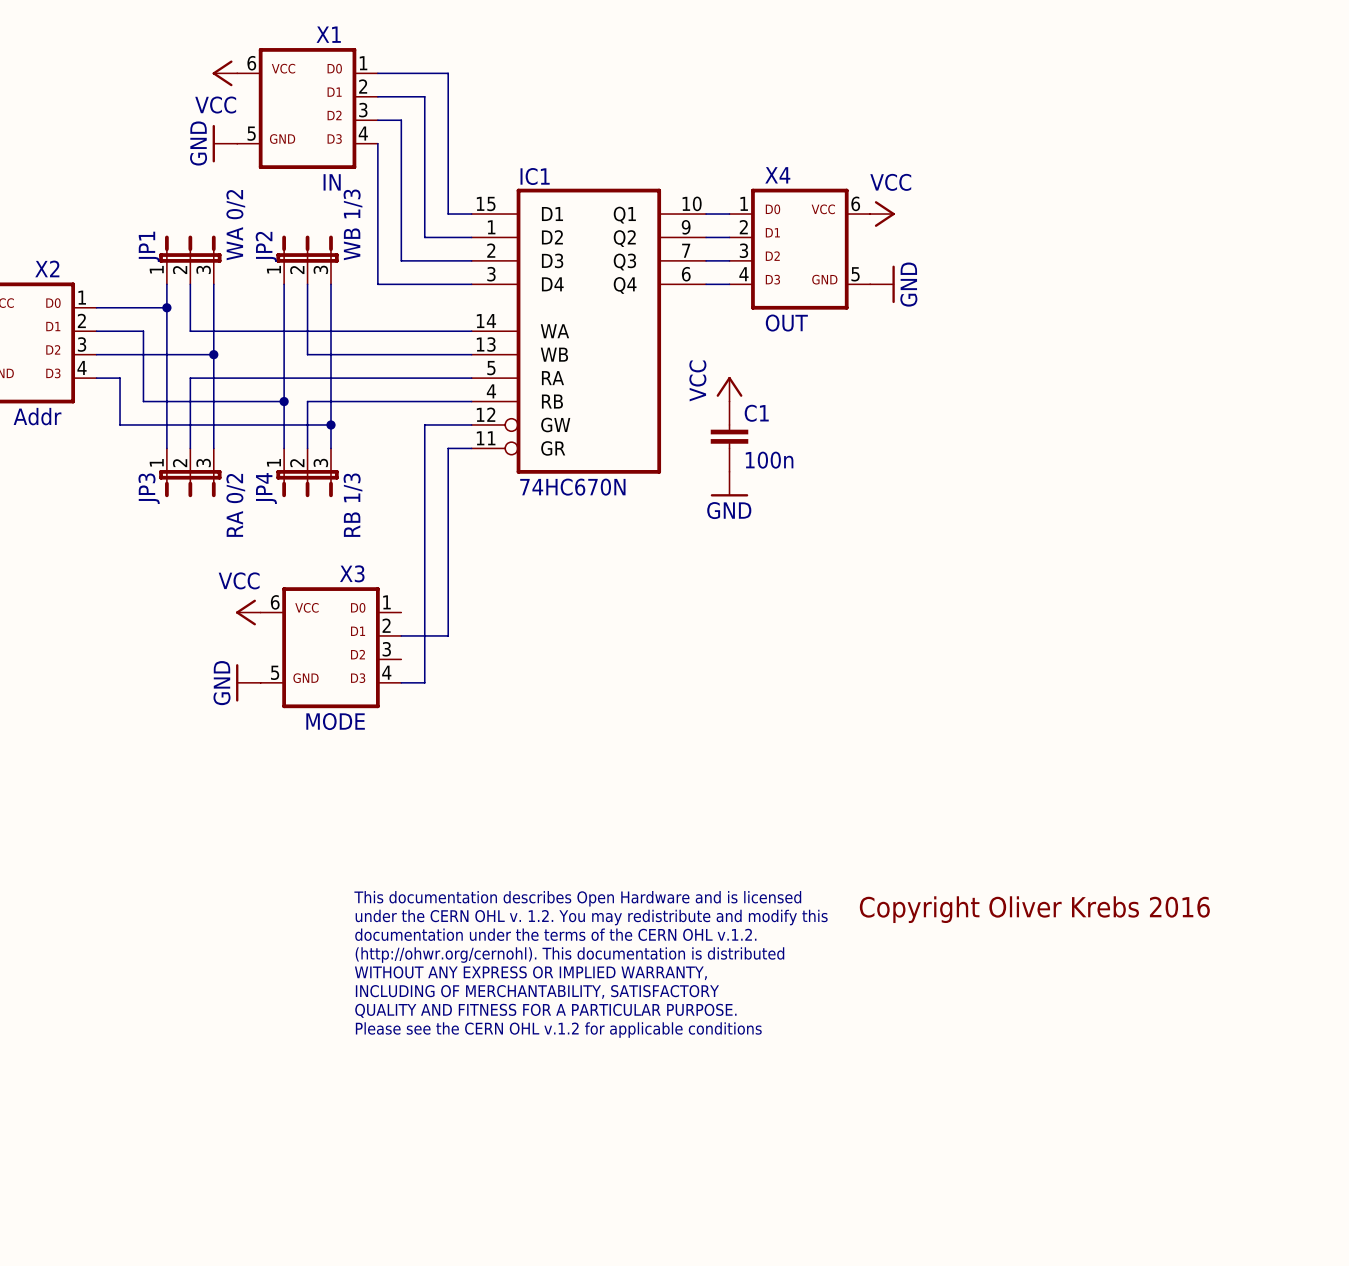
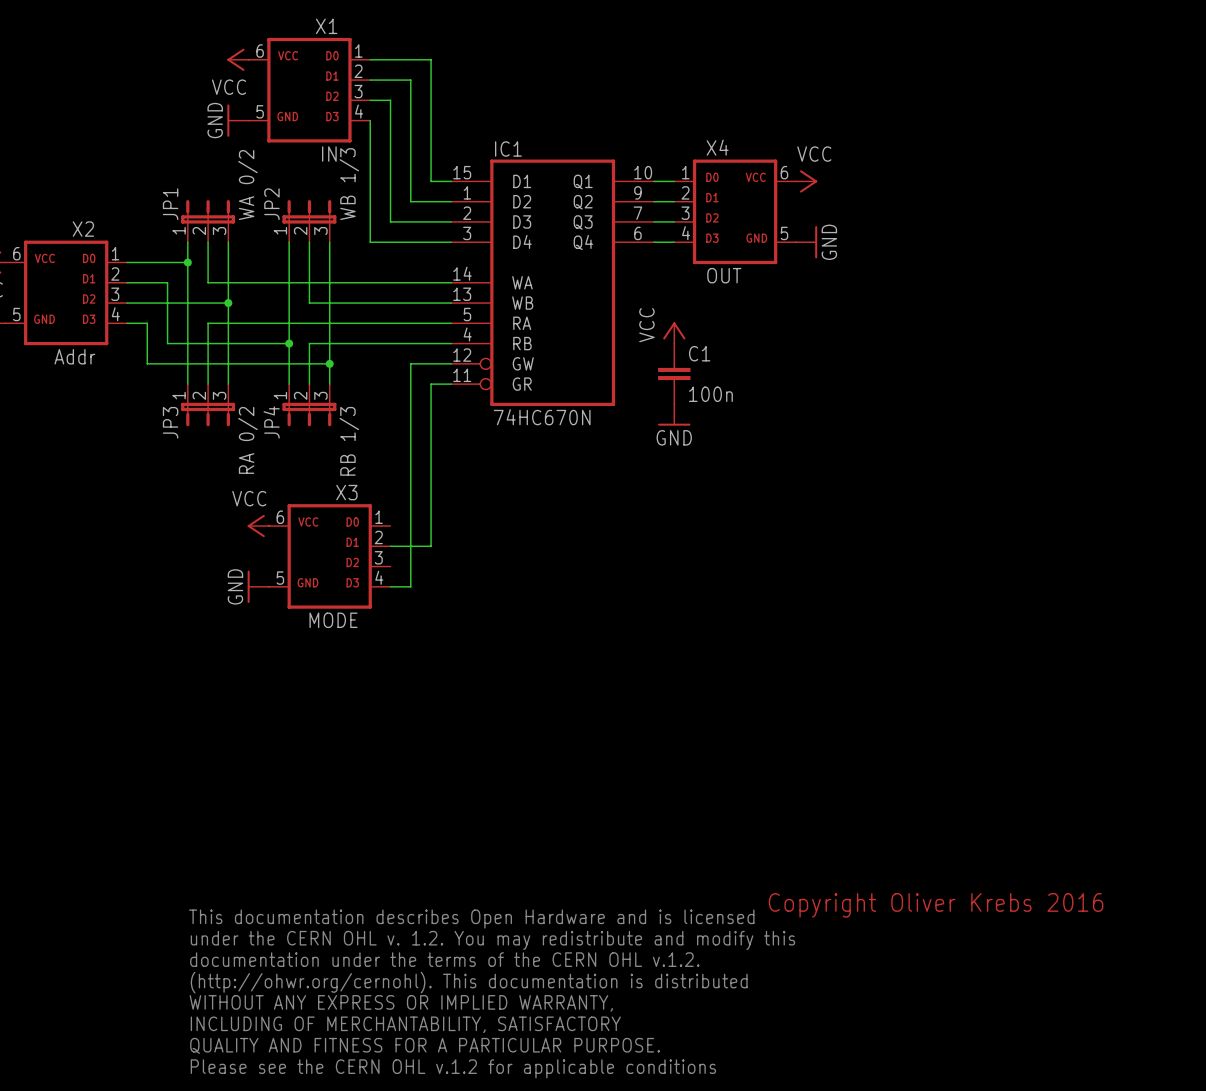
text: This documentation describes Open Hardware and is licensed (577, 898) -> none
text position: Copyright Oliver Krebs 2016 (1034, 909) -> Copyright Oliver Krebs 2016 (936, 905)
text: under the CERN OHL v. 1.2. You may redistribute and modify this (591, 917) -> none
text: documentation under the terms of the CERN OHL v.1.2. (555, 934) -> none
text: (http://ohwr.org/cernohl). This documentation is distributed (569, 955) -> none
text: WITHOUT ANY EXPRESS OR IMPLIED WARRANTY, (530, 973) -> none
text: INCLUDING OF MERCHANTABILITY, SATISFACTORY (537, 991) -> none
text: QUALITY AND FITNESS FOR A PARTICULAR PURPOSE. (545, 1010) -> none
text: Please see the CERN OHL v.1.2 for applicable conditions (558, 1030) -> none
text: none -> This documentation describes Open Hardware and is licensed (471, 919)
text: none -> under the CERN OHL v. 1.2. You may redistribute and modify this (492, 940)
text: none -> documentation under the terms of the CERN OHL v.1.2. (444, 959)
text: none -> (http://ohwr.org/cernohl). This documentation is distributed (469, 982)
text: none -> WITHOUT ANY EXPRESS OR IMPLIED WARRANTY, (401, 1003)
text: none -> INCLUDING OF MERCHANTABILITY, SATISFACTORY (405, 1024)
text: none -> QUALITY AND FITNESS FOR A PARTICULAR PURPOSE. (425, 1045)
text: none -> Please see the CERN OHL v.1.2 for applicable conditions (453, 1068)

